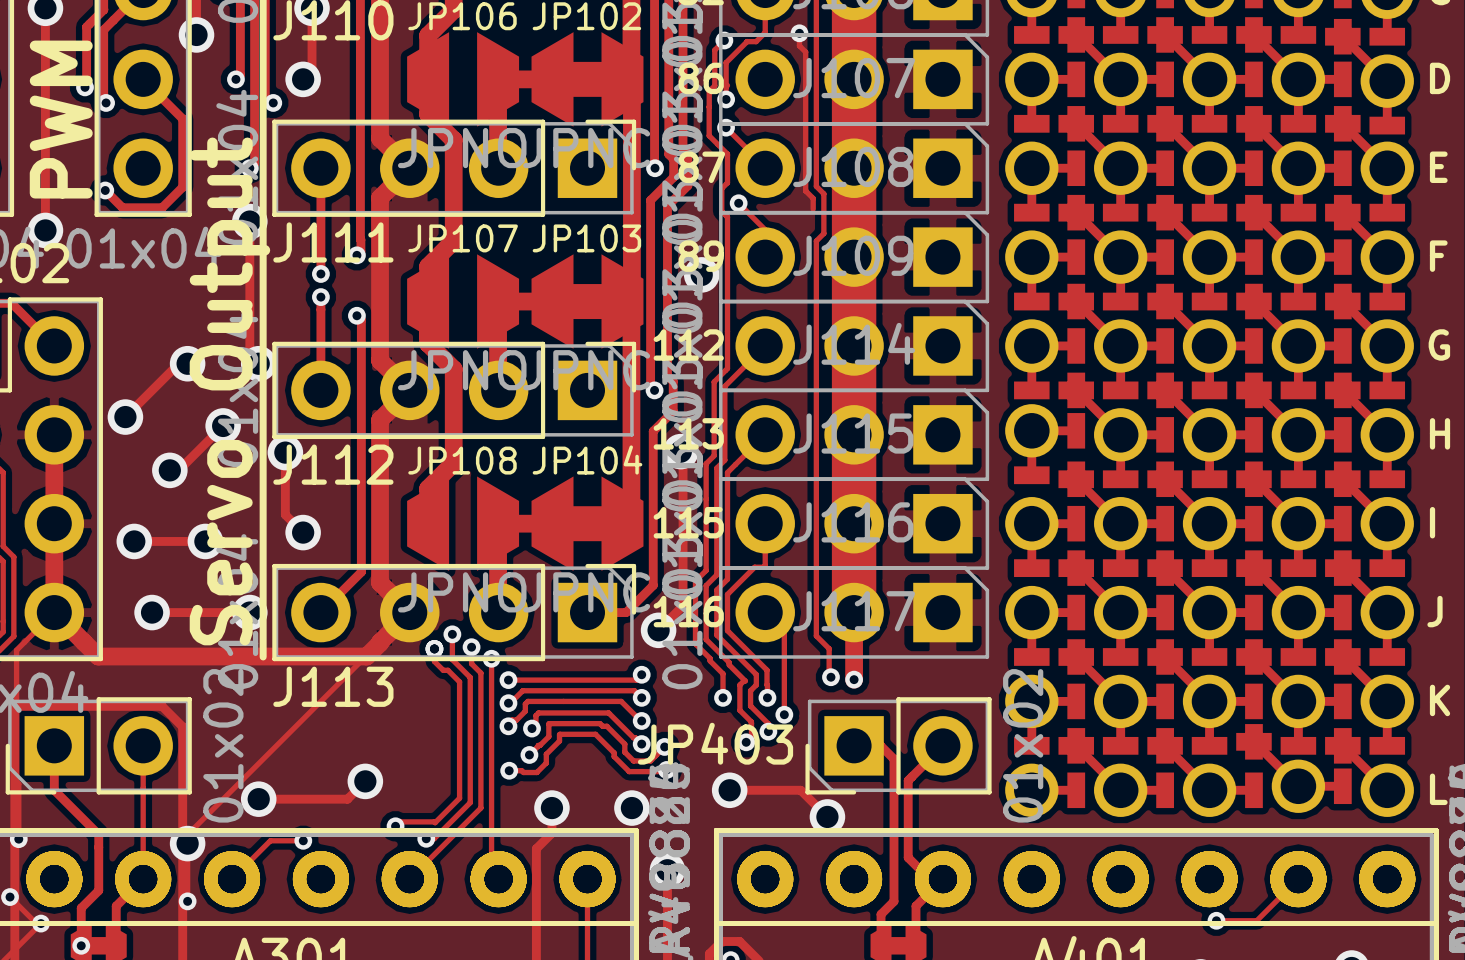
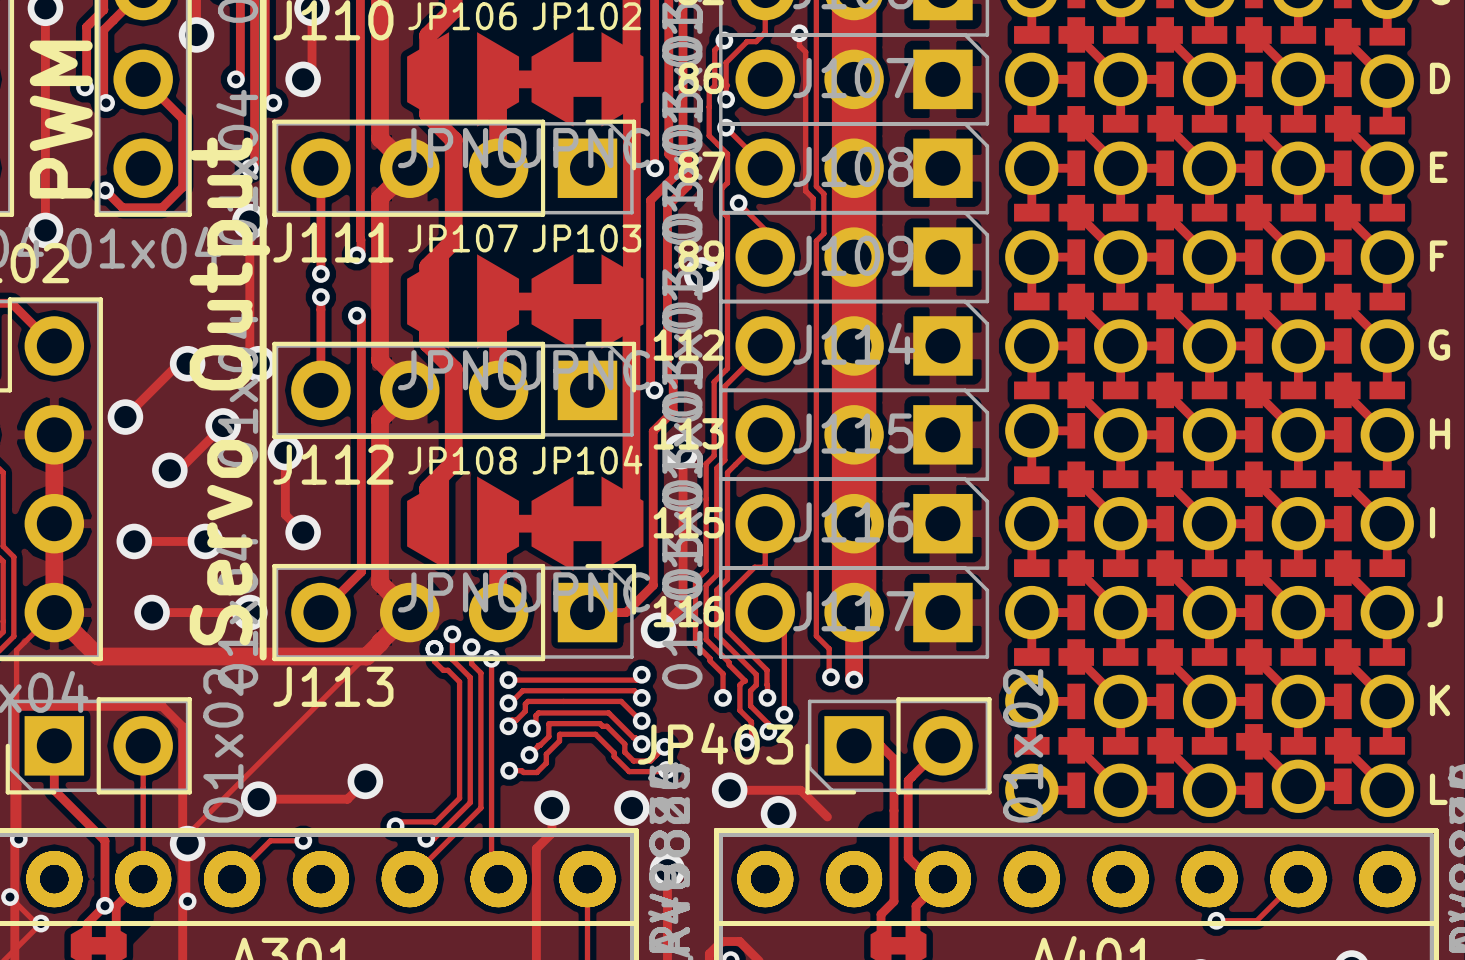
via position: (827, 816) -> (778, 813)
track: (98, 834) (98, 890) (81, 908) (81, 945) -> (98, 834) (104, 840) (104, 905) (87, 923) (87, 939) (81, 945)
via position: (81, 945) -> (104, 905)

